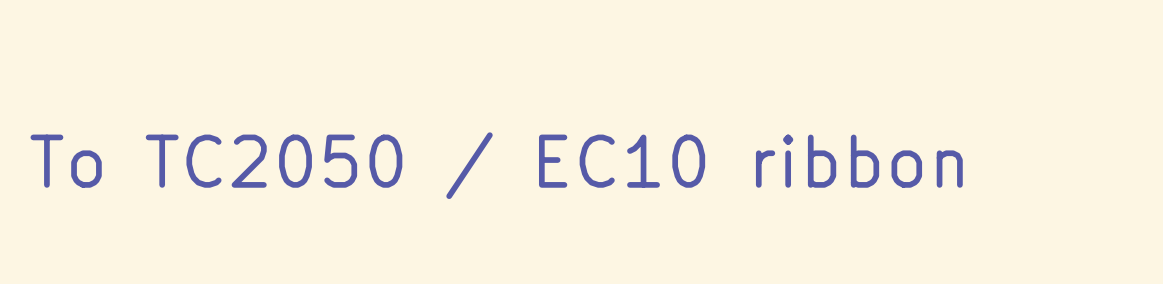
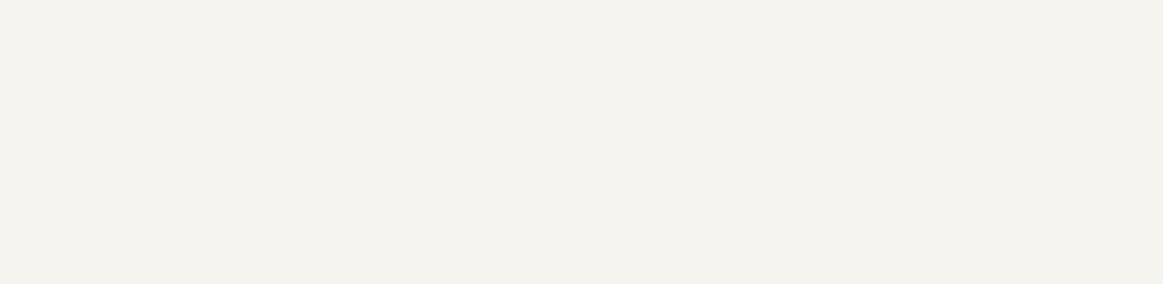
text: To TC2050 / EC10 ribbon (496, 165) -> none

